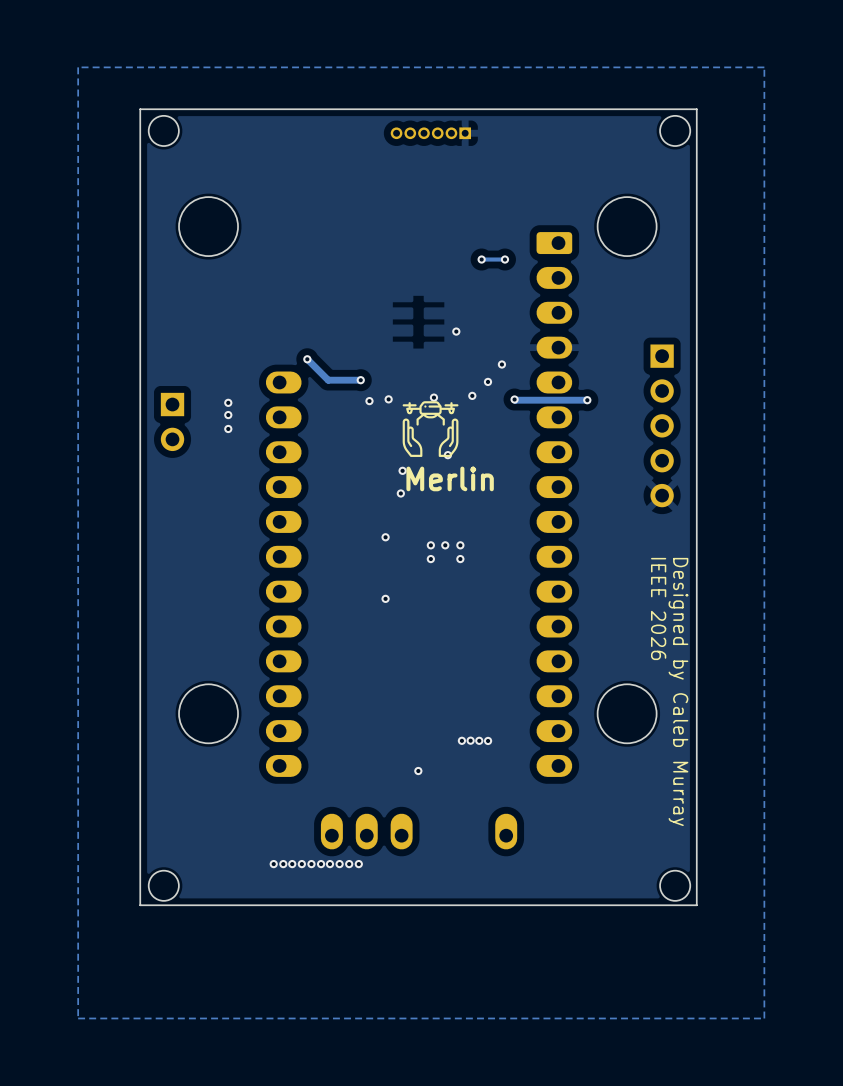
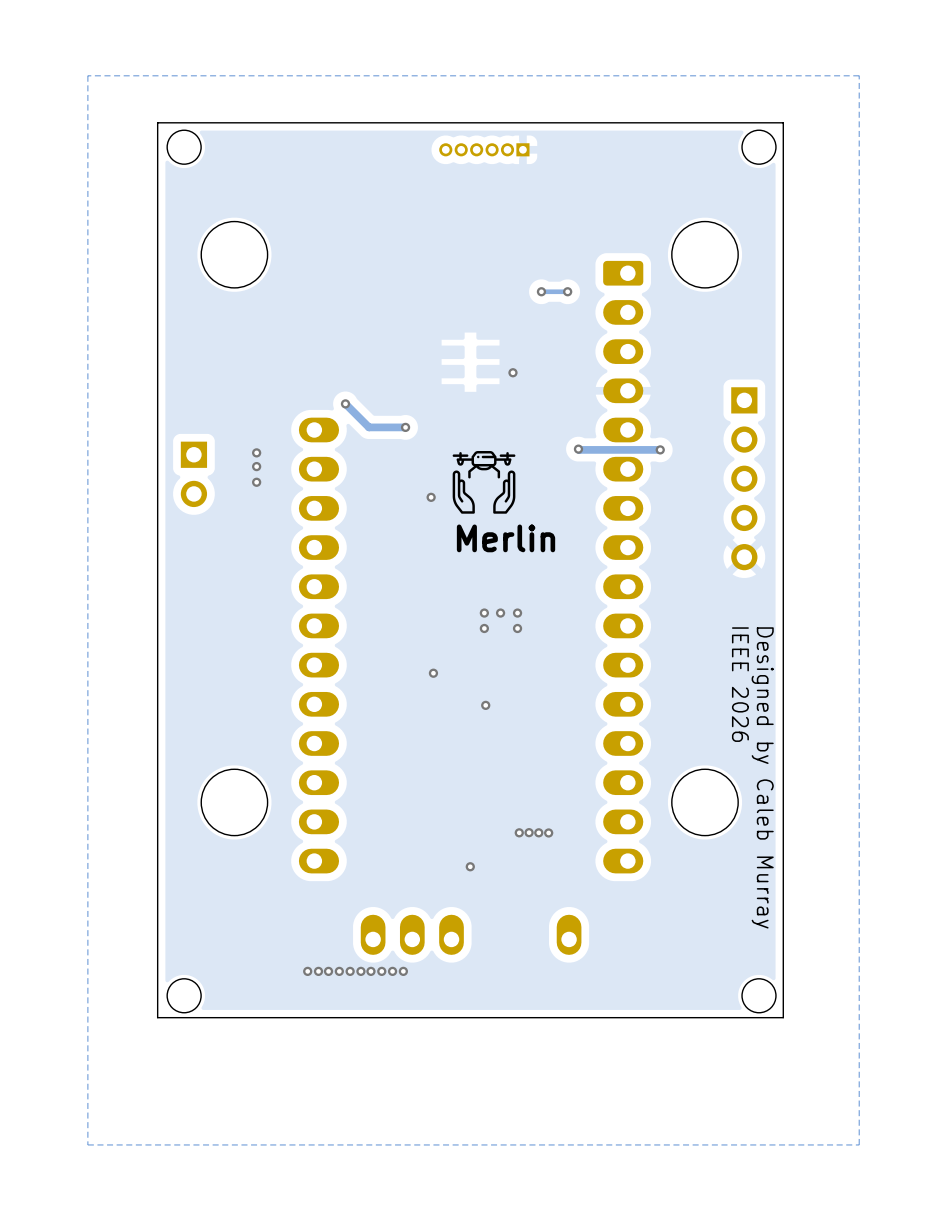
via: (501, 364) -> none
via: (487, 381) -> none
via: (472, 395) -> none
via: (433, 397) -> none
via: (388, 399) -> none
via: (369, 401) -> none
via: none -> (431, 497)
via: (447, 455) -> none
via: (402, 470) -> none
via: (400, 493) -> none
via: (385, 537) -> none
via: none -> (485, 705)

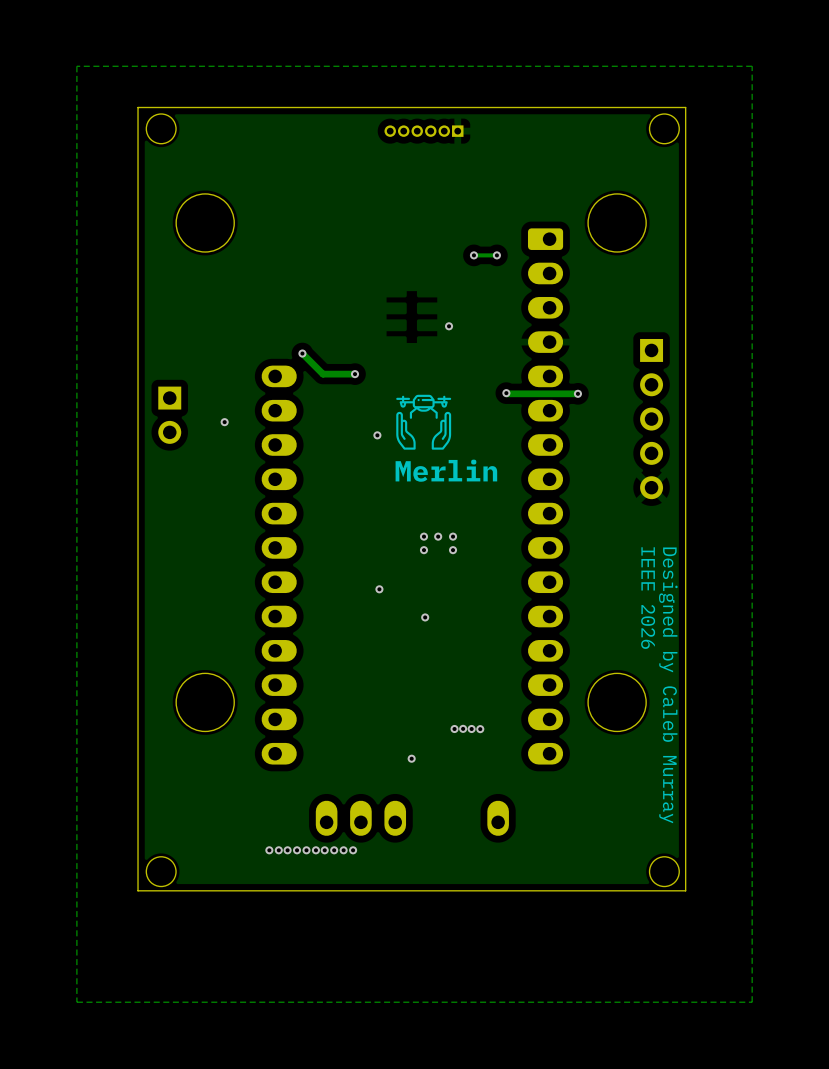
via: (256, 452) -> none
via: (256, 466) -> none

